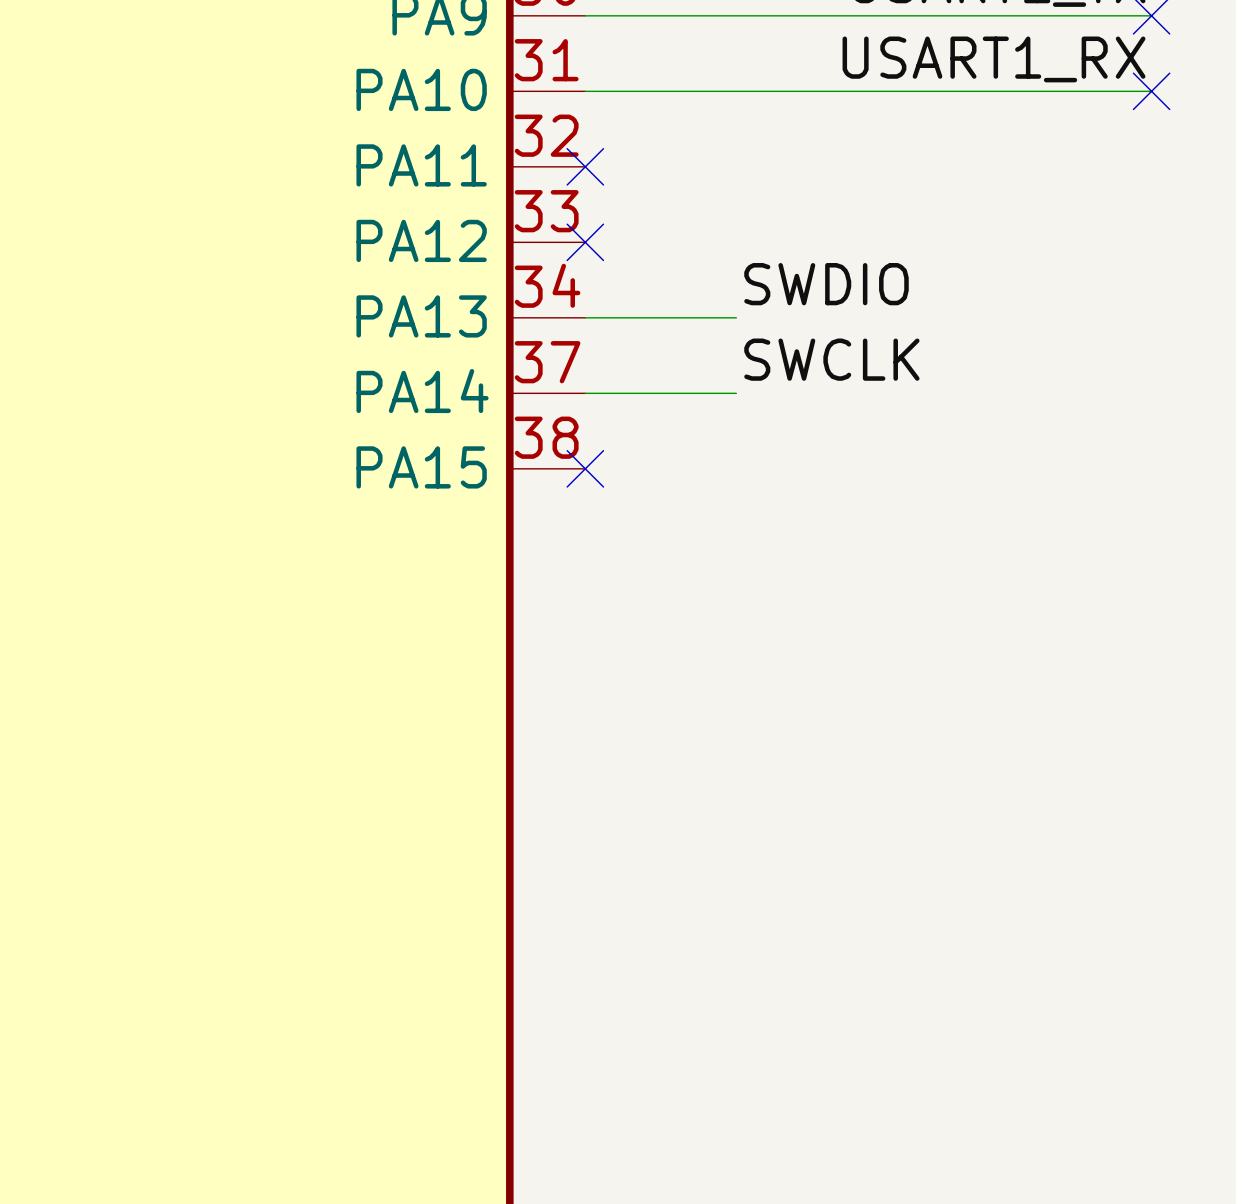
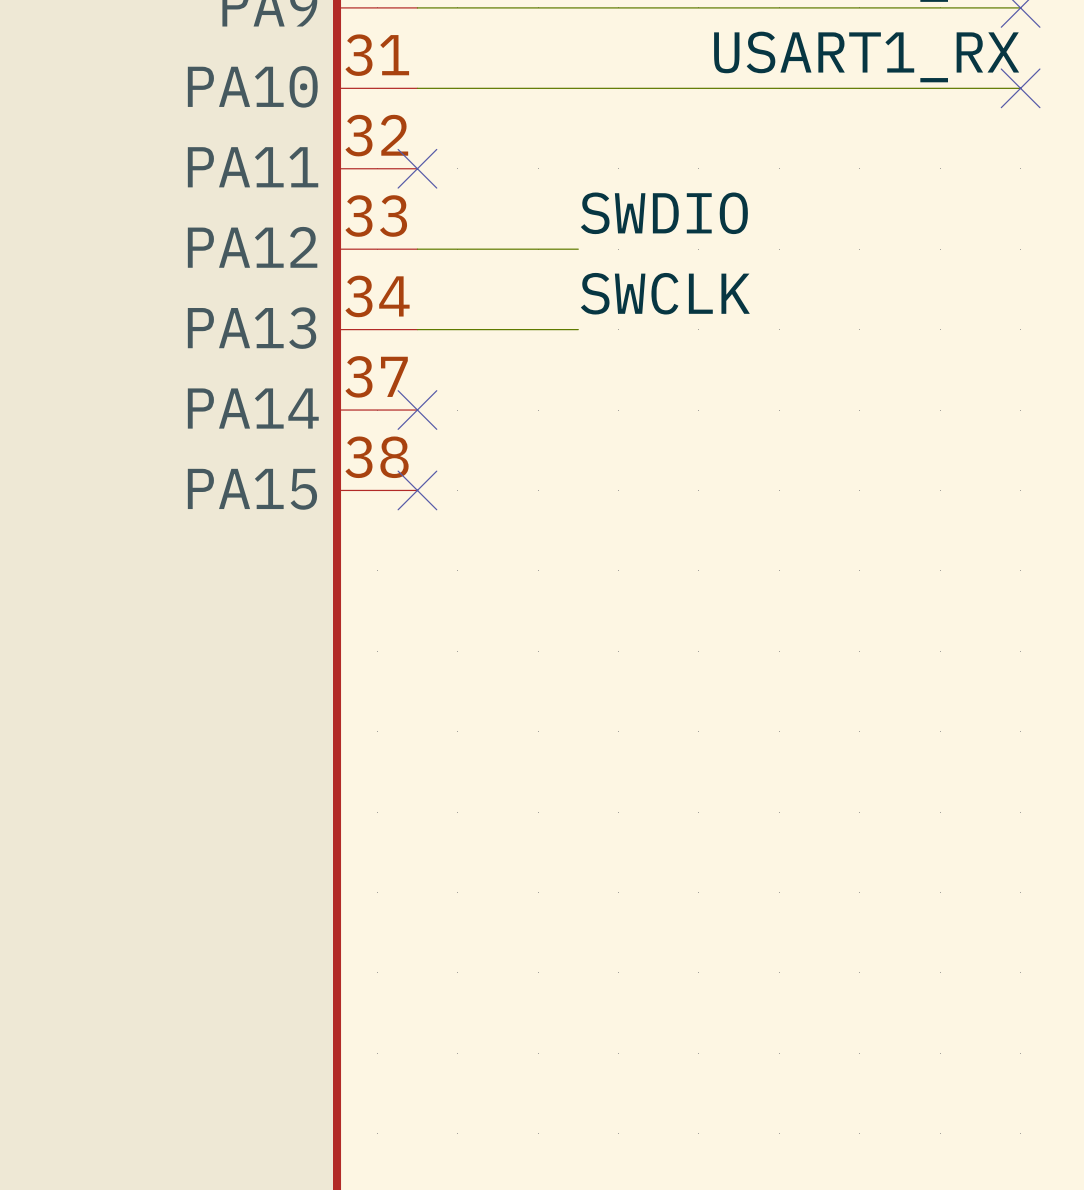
label: none -> SWDIO (664, 213)
no-connect mark position: (585, 242) -> (417, 410)
label: SWDIO (826, 284) -> SWCLK (665, 293)
label: SWCLK (831, 359) -> none
wire: (585, 393) (736, 393) -> (417, 249) (578, 249)

